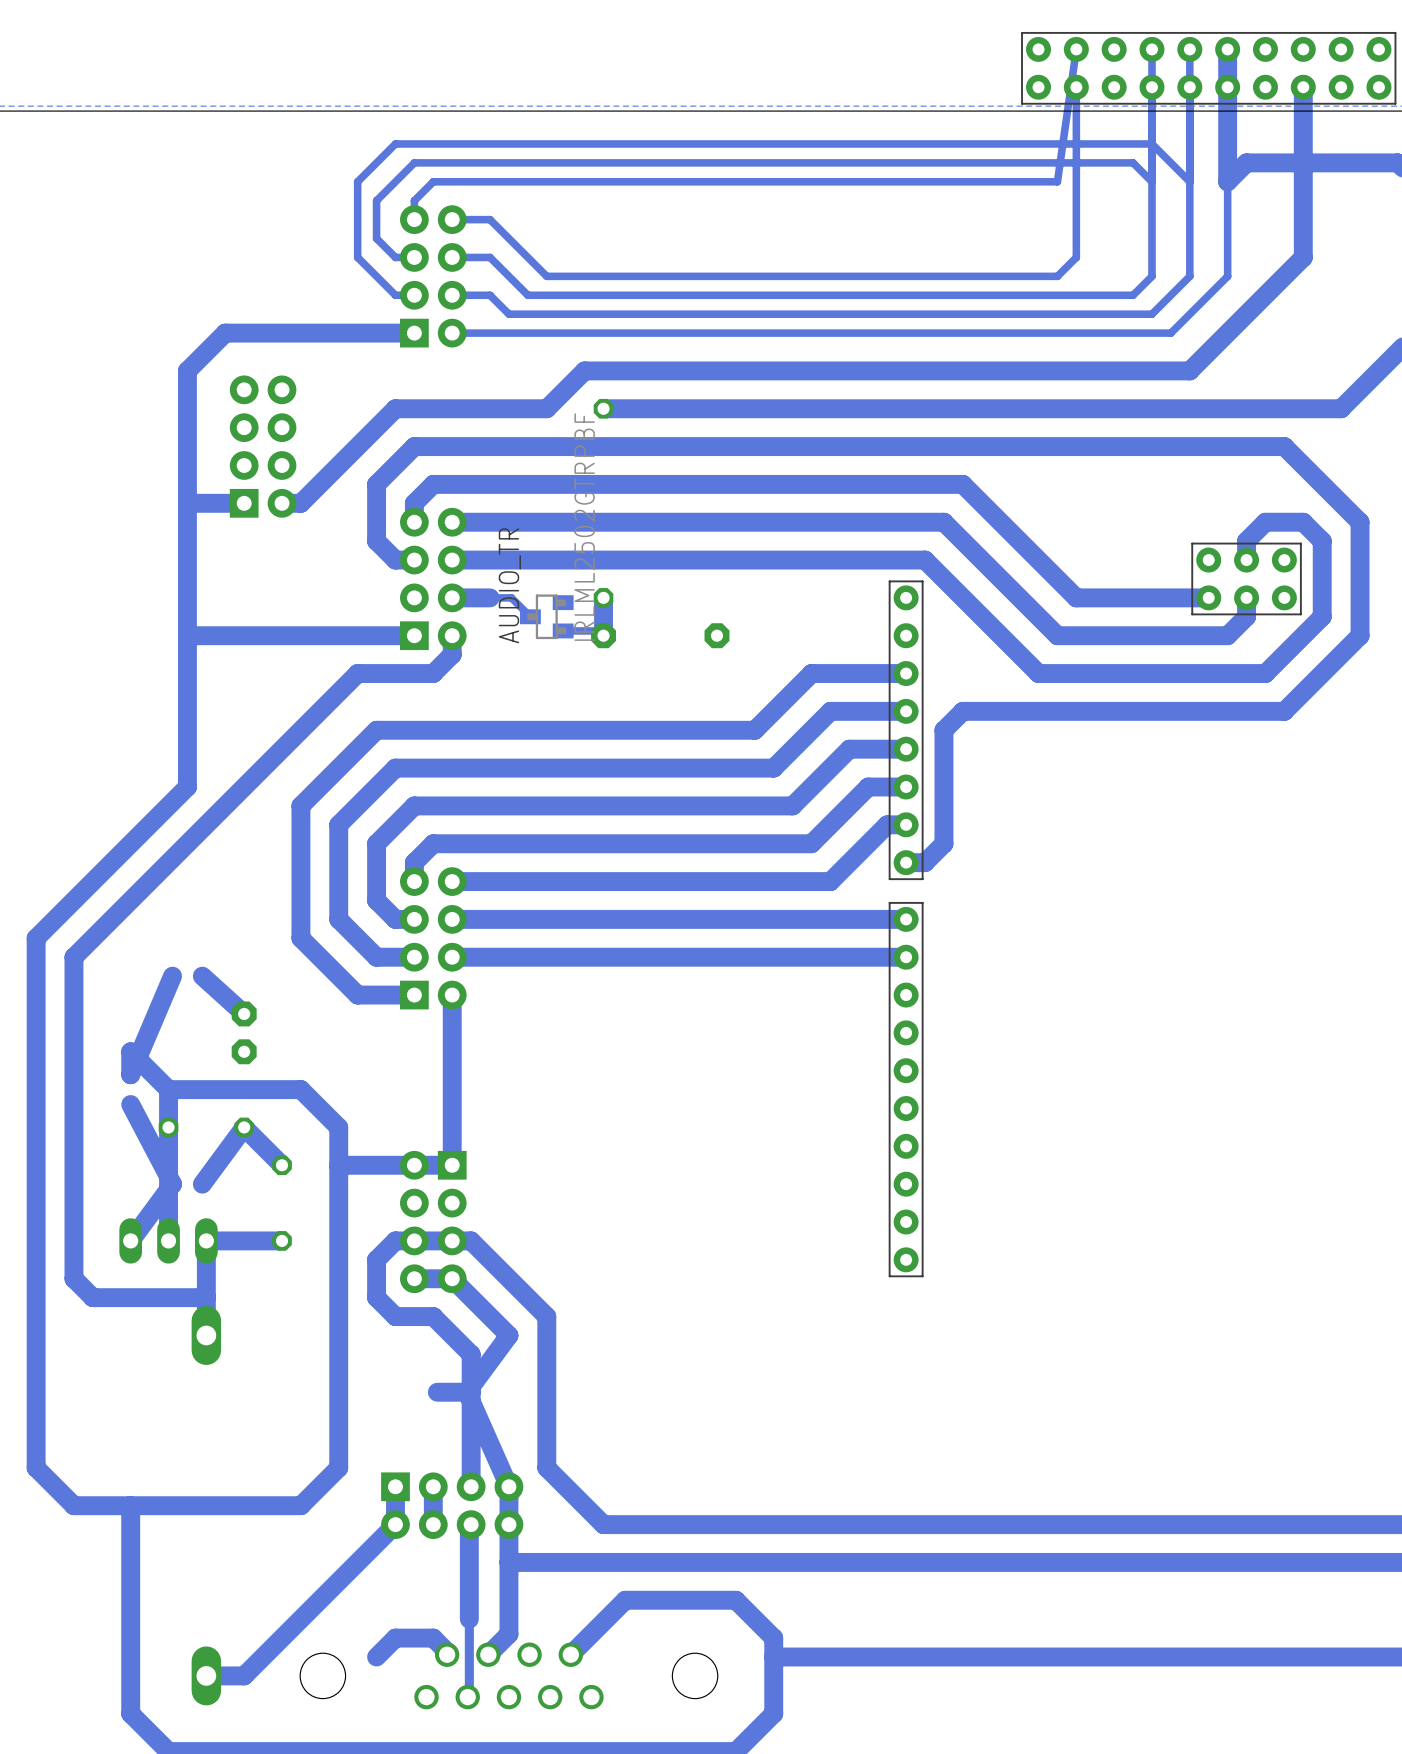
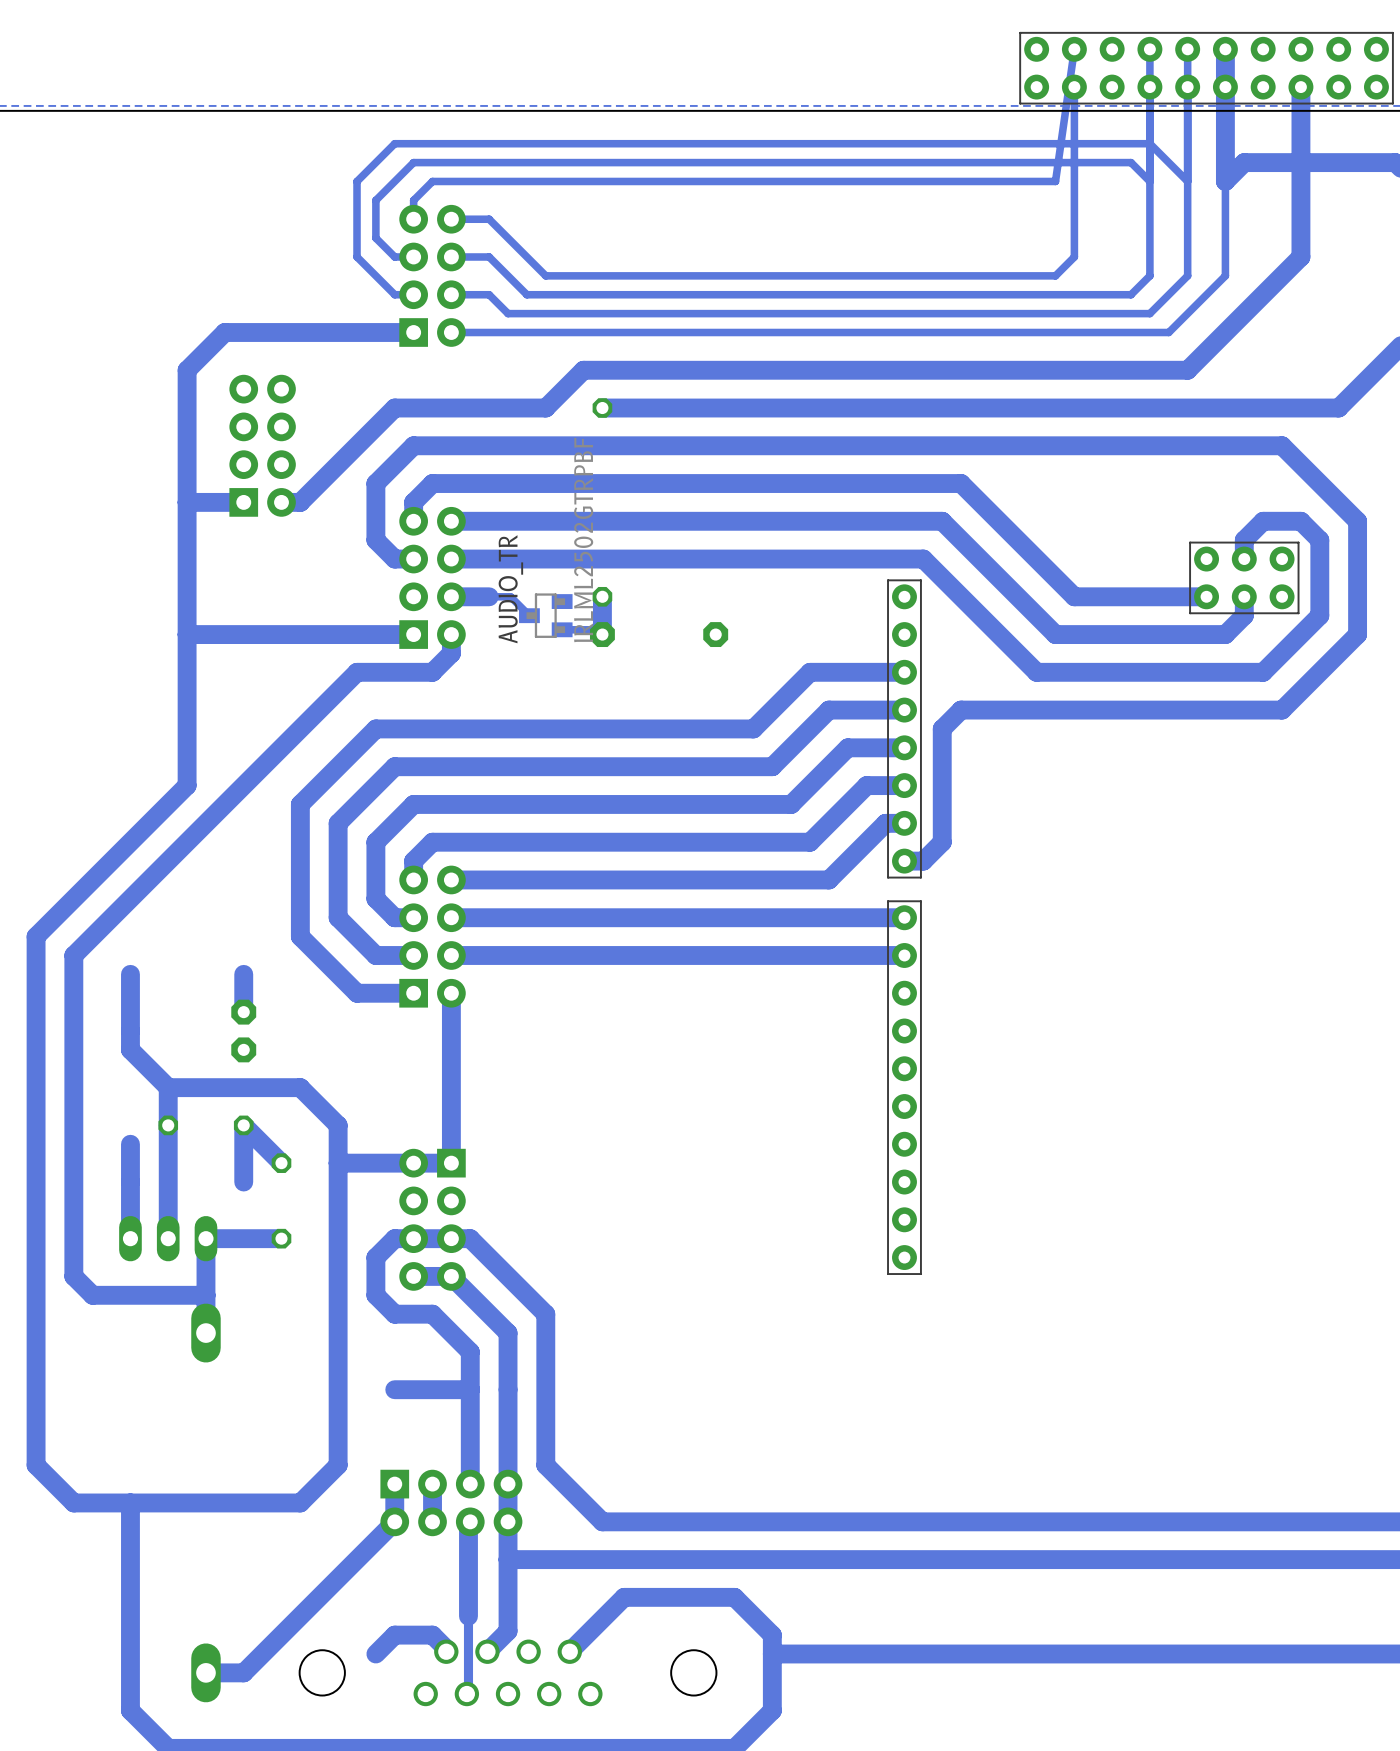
track: (172, 976) (130, 1074) (130, 1051) -> (130, 974) (130, 1049)
track: (202, 976) (244, 1013) -> (243, 974) (243, 1012)
track: (130, 1104) (172, 1184) (130, 1240) -> (130, 1144) (130, 1238)
track: (244, 1127) (202, 1184) -> (243, 1125) (243, 1182)
track: (508, 1335) (467, 1392) (508, 1486) -> (508, 1333) (508, 1484)
track: none -> (436, 1389) (394, 1389)

